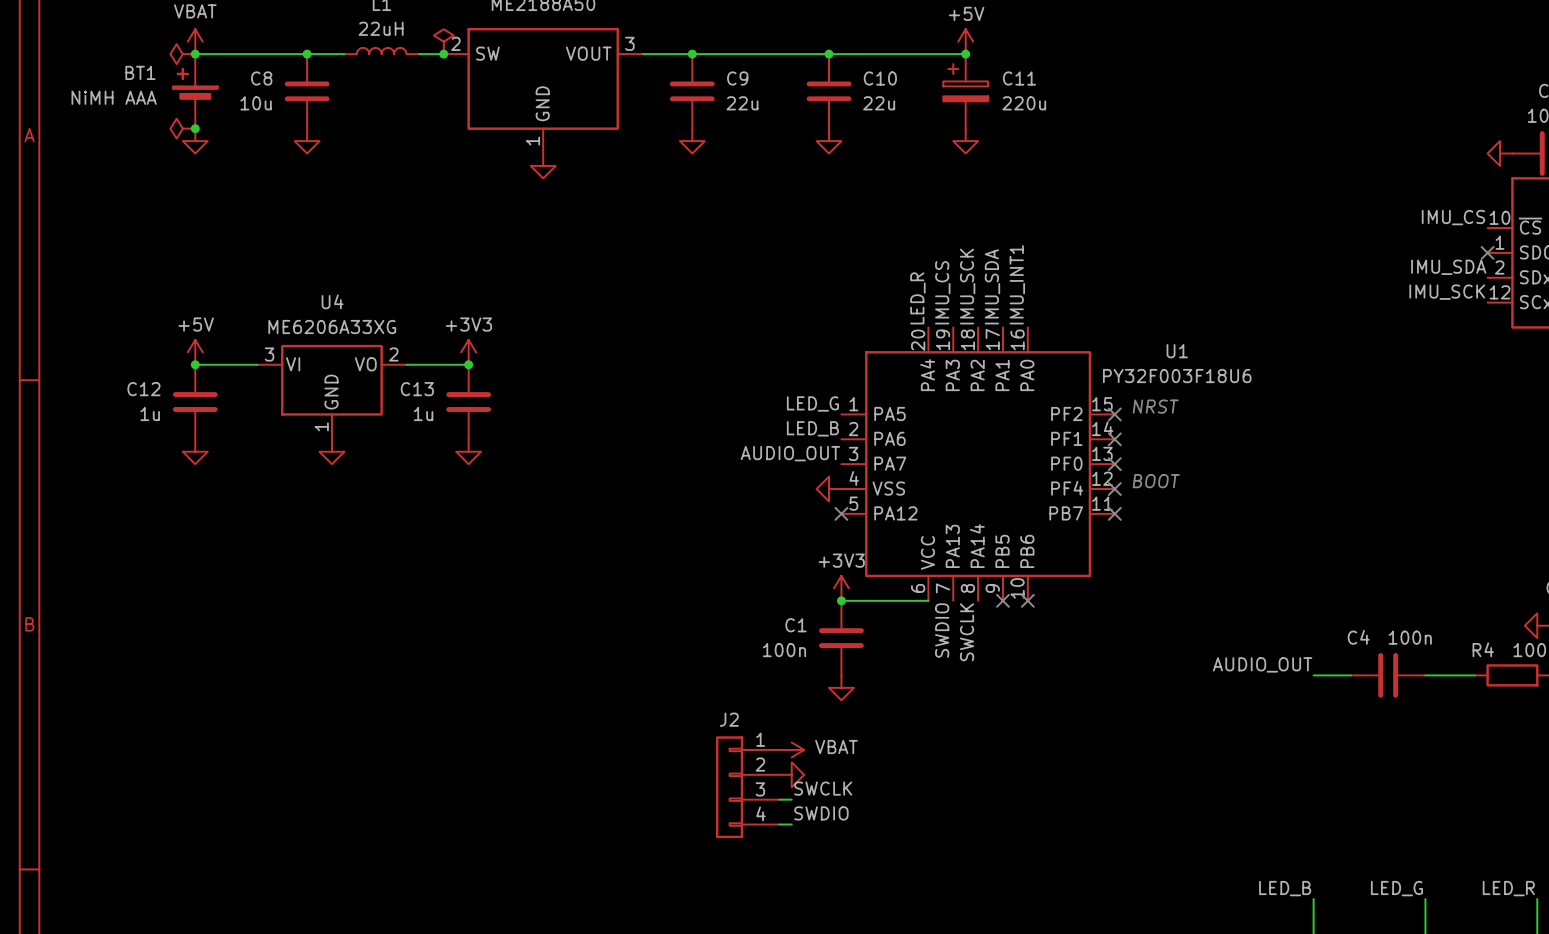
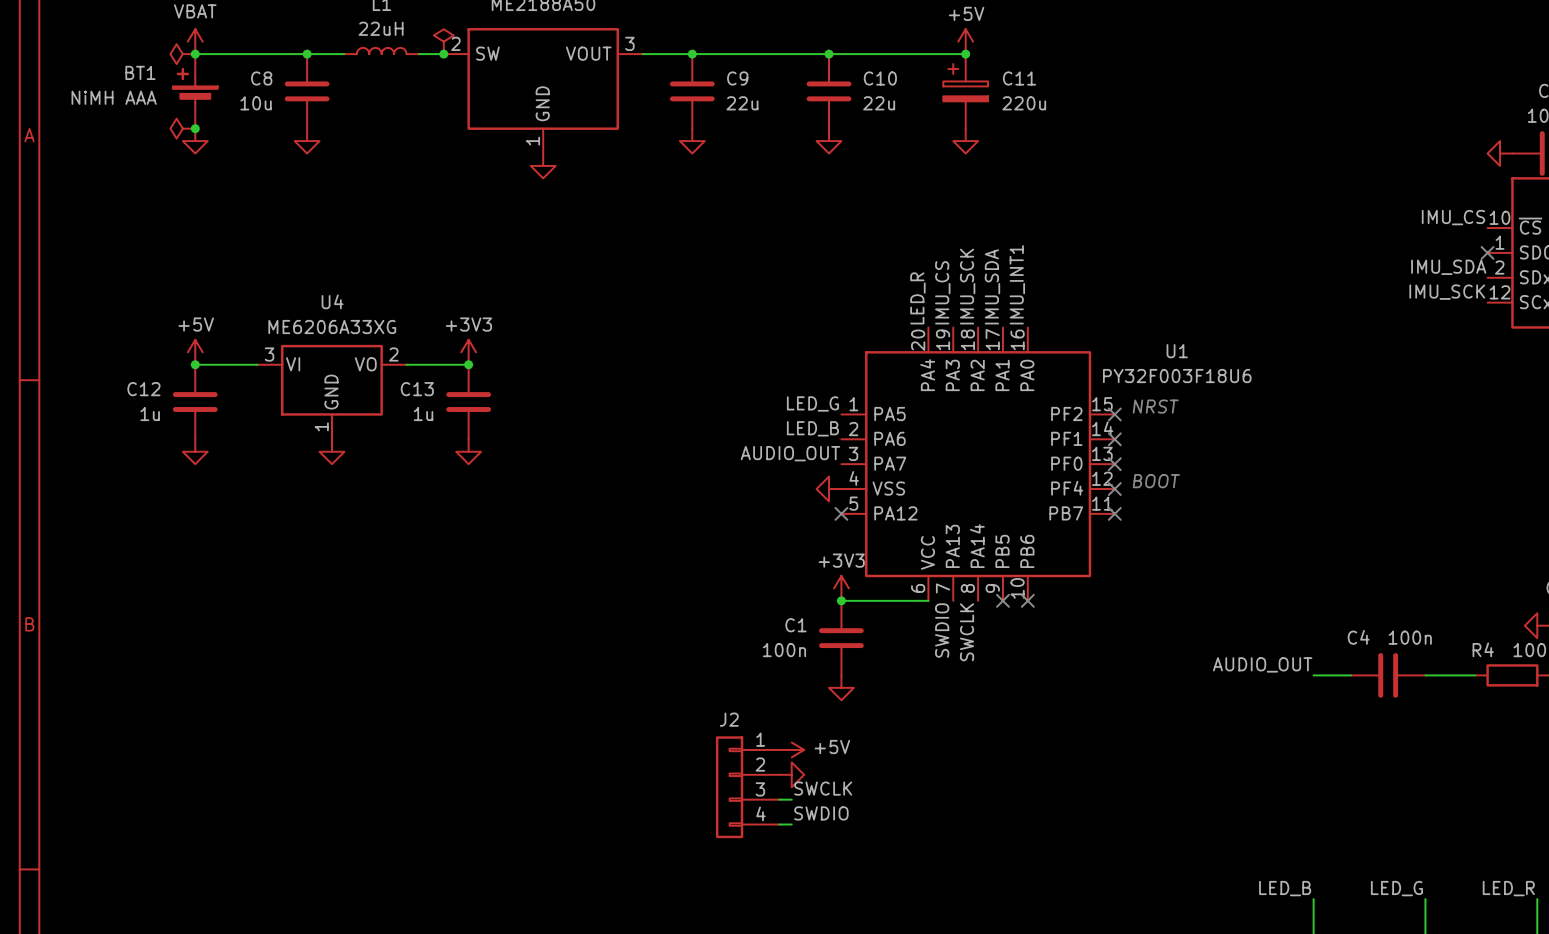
power symbol: VBAT (791, 749) -> +5V (791, 749)

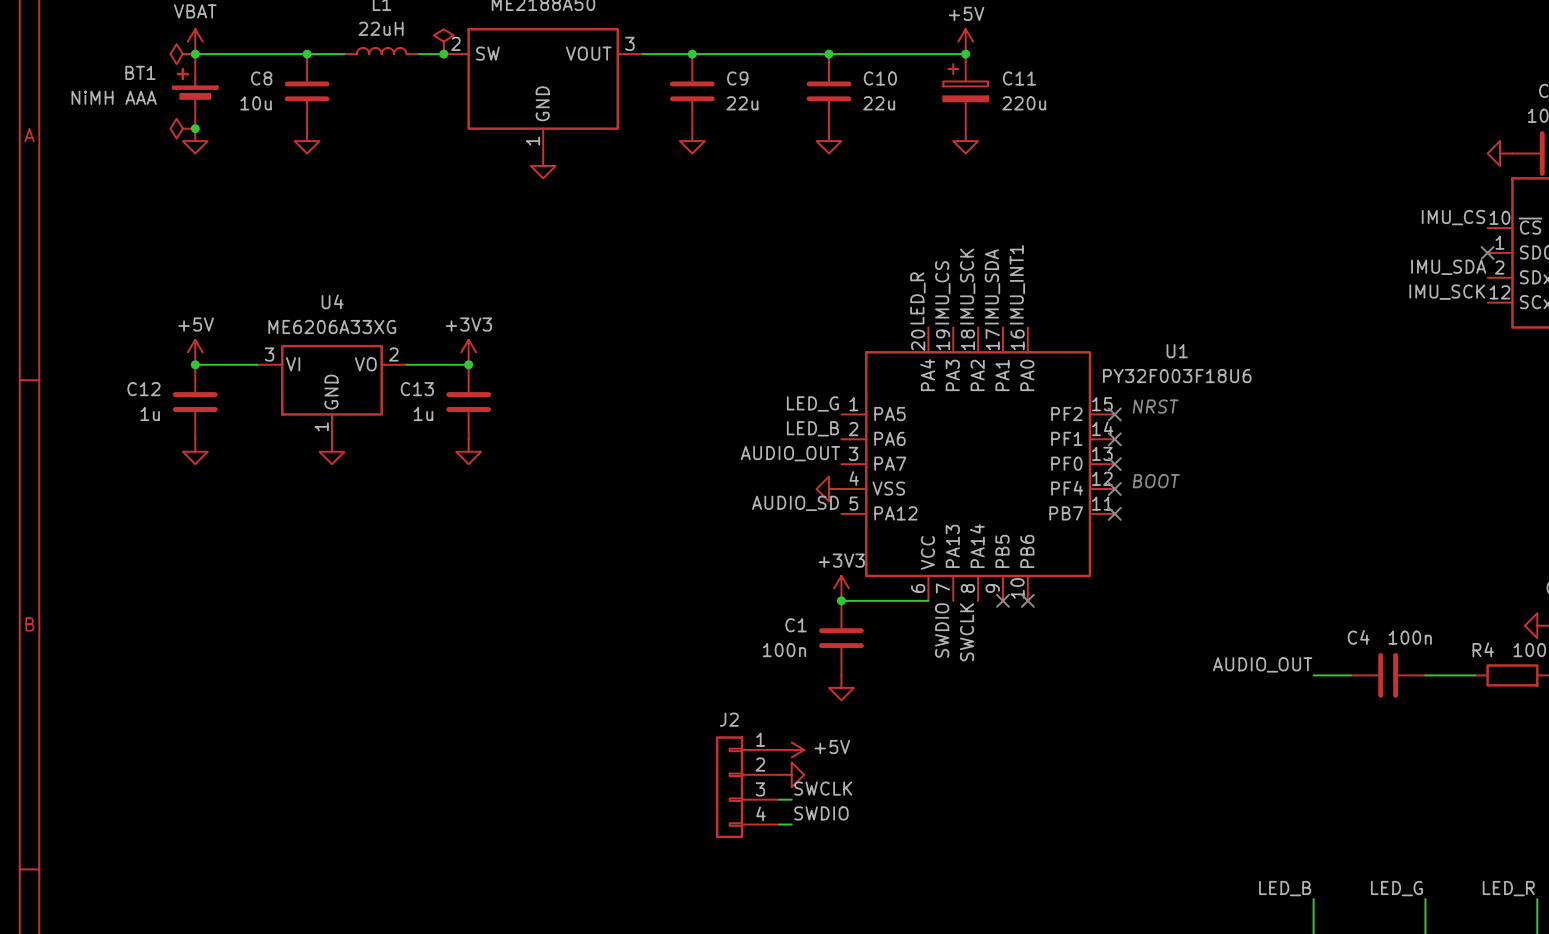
label: none -> AUDIO_SD (795, 503)
no-connect mark: (841, 513) -> none

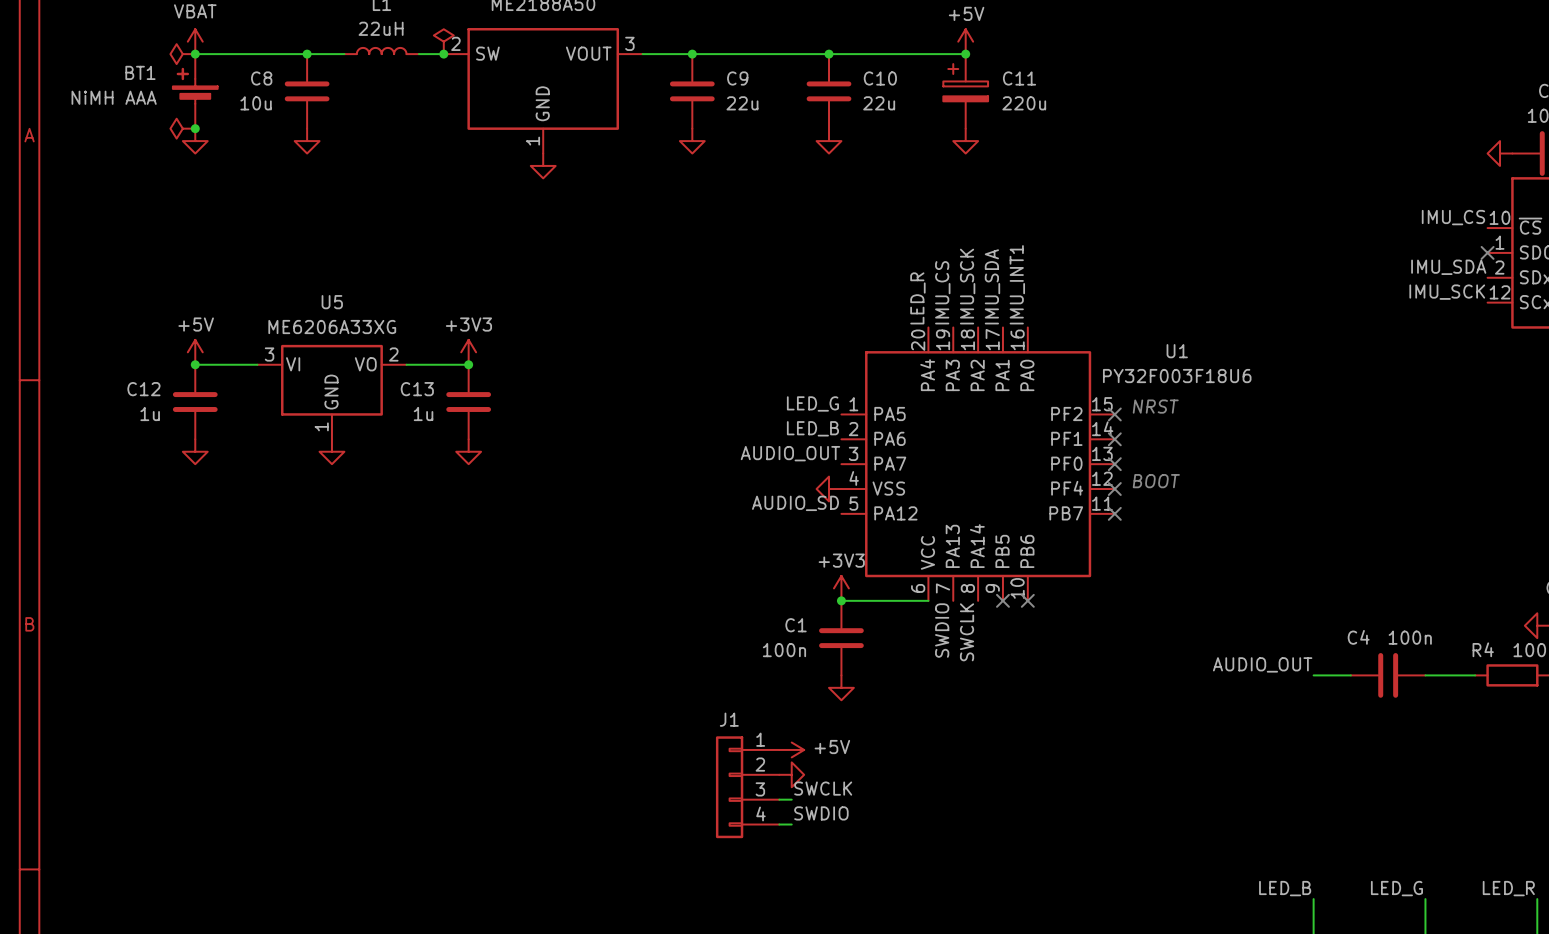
U4 name: U4 (332, 301) -> U5 (332, 302)
J2 name: J2 (729, 719) -> J1 (729, 719)

